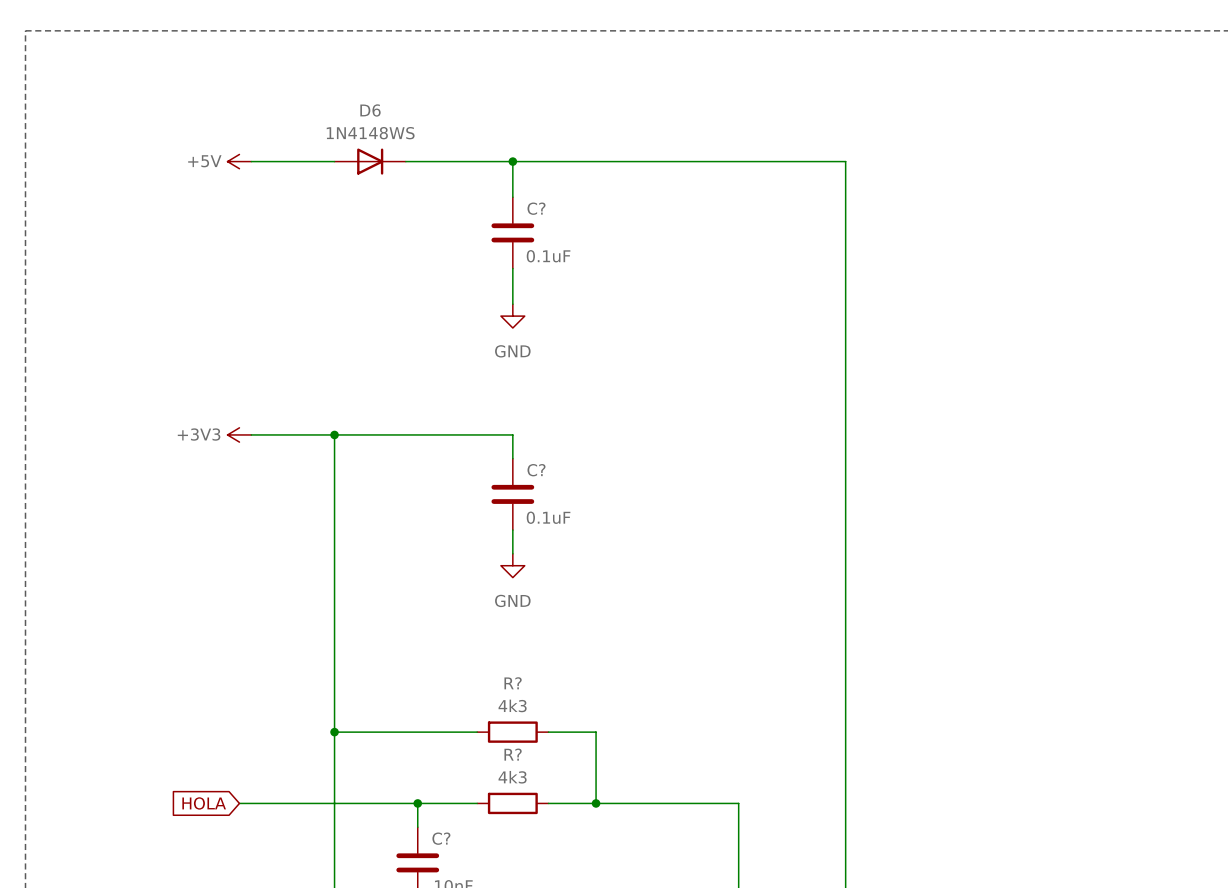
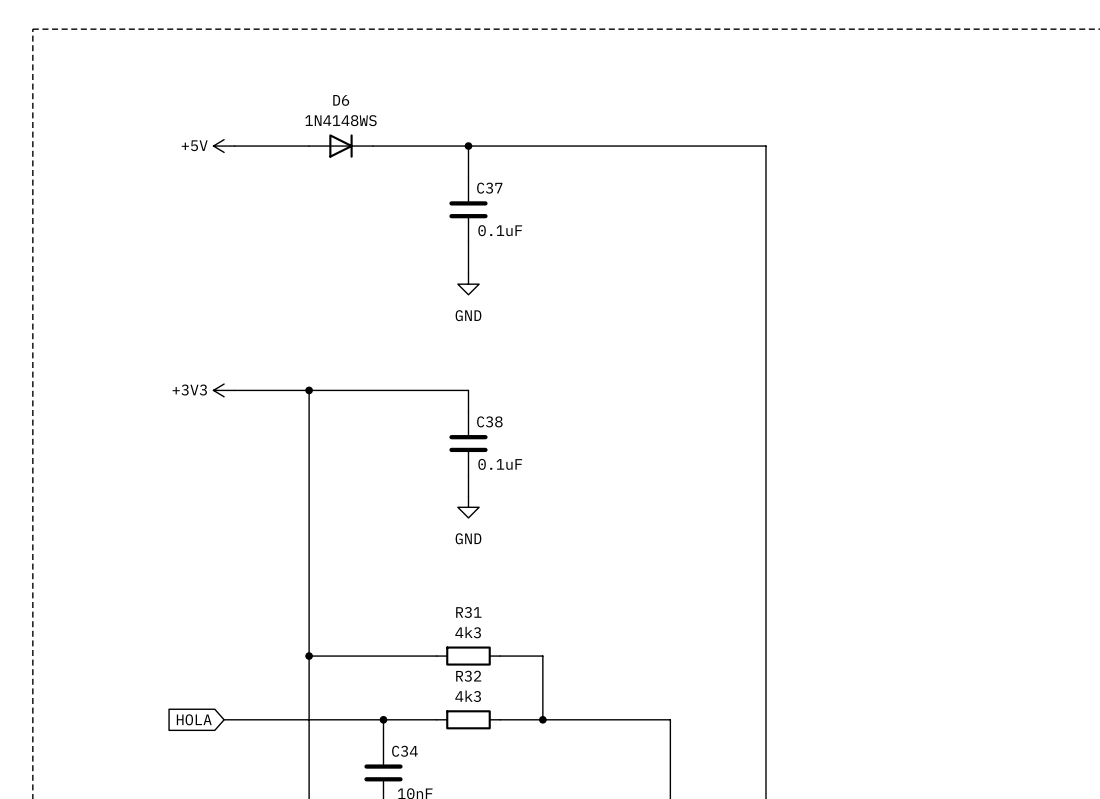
C? name: C? (536, 208) -> C37 (489, 188)
C? name: C? (536, 470) -> C38 (489, 421)
R? name: R? (513, 683) -> R31 (468, 612)
R? name: R? (513, 754) -> R32 (468, 676)
C? name: C? (441, 838) -> C34 (404, 751)

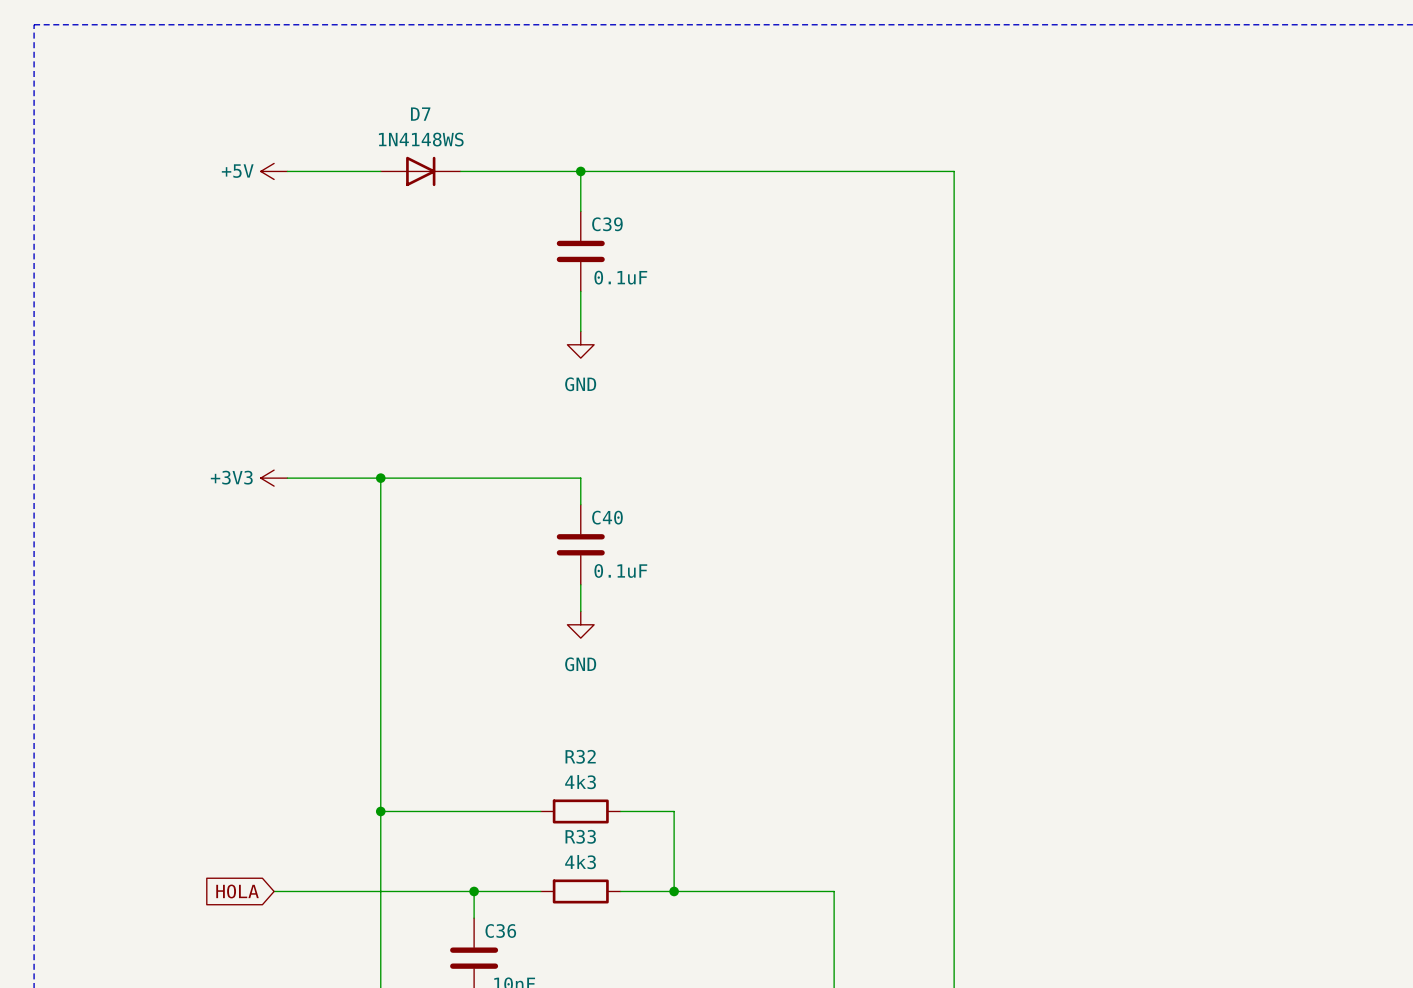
D6 name: D6 (341, 100) -> D7 (420, 114)
C37 name: C37 (489, 188) -> C39 (607, 224)
C38 name: C38 (489, 421) -> C40 (607, 517)
R31 name: R31 (468, 612) -> R32 (580, 756)
R32 name: R32 (468, 676) -> R33 (580, 836)
C34 name: C34 (404, 751) -> C36 (500, 930)

